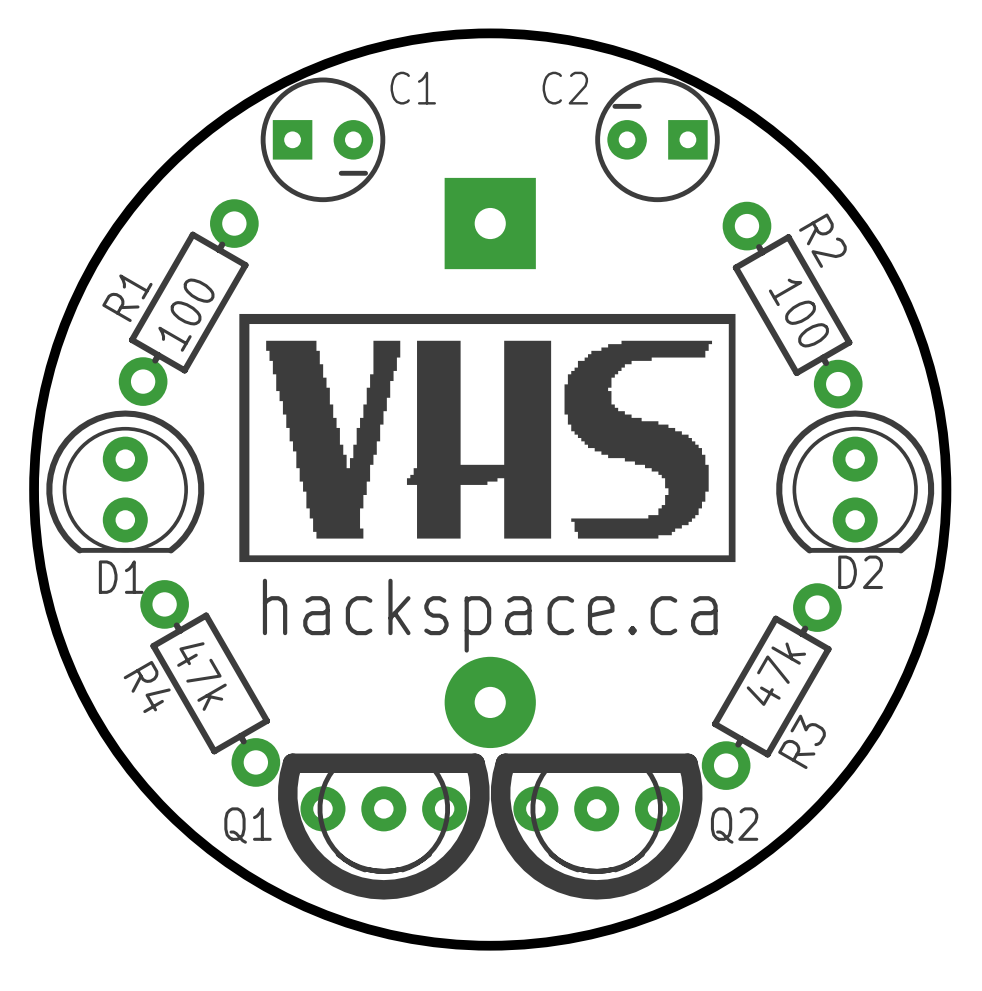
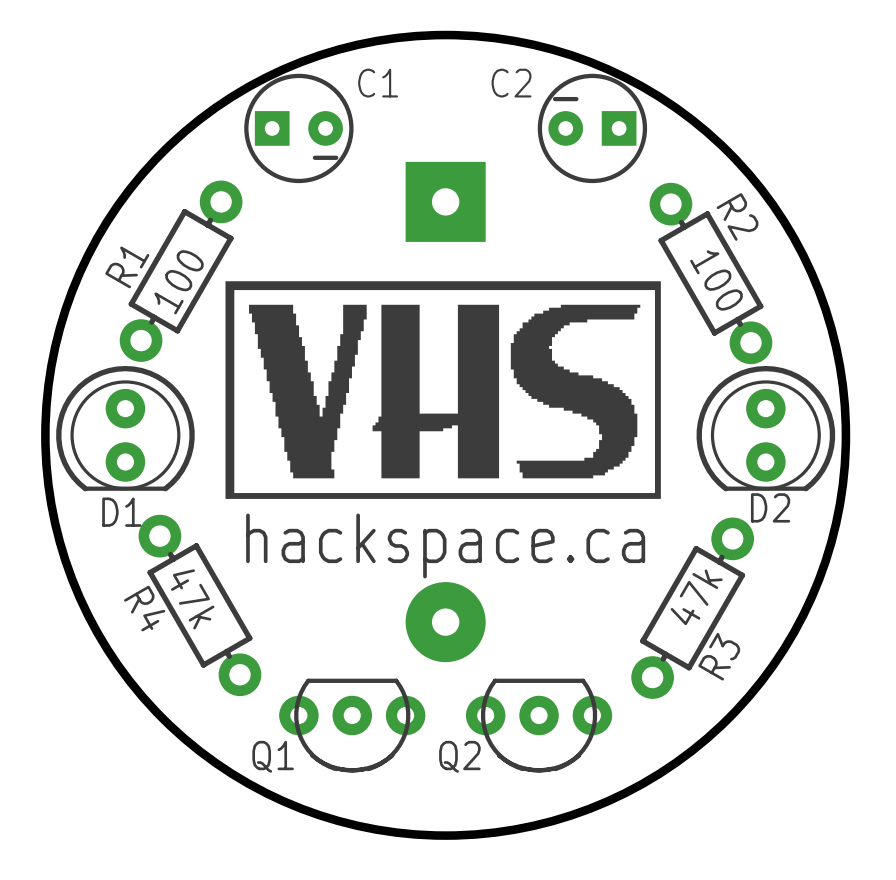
line: (292, 763) (475, 763) (479, 787) (478, 811) (475, 822) (465, 844) (458, 854) (440, 871) (430, 877) (419, 883) (395, 889) (371, 889) (359, 886) (337, 877) (327, 871) (309, 854) (302, 844) (292, 822) (289, 811) (287, 787) (292, 763) -> none
line: (505, 763) (687, 763) (692, 787) (691, 811) (688, 822) (678, 844) (671, 854) (653, 871) (643, 877) (632, 883) (608, 889) (584, 889) (572, 886) (550, 877) (539, 871) (522, 854) (515, 844) (505, 822) (502, 811) (500, 787) (505, 763) -> none
Q1 name position: Q1 (247, 825) -> Q1 (273, 756)
Q2 name position: Q2 (734, 825) -> Q2 (459, 756)

